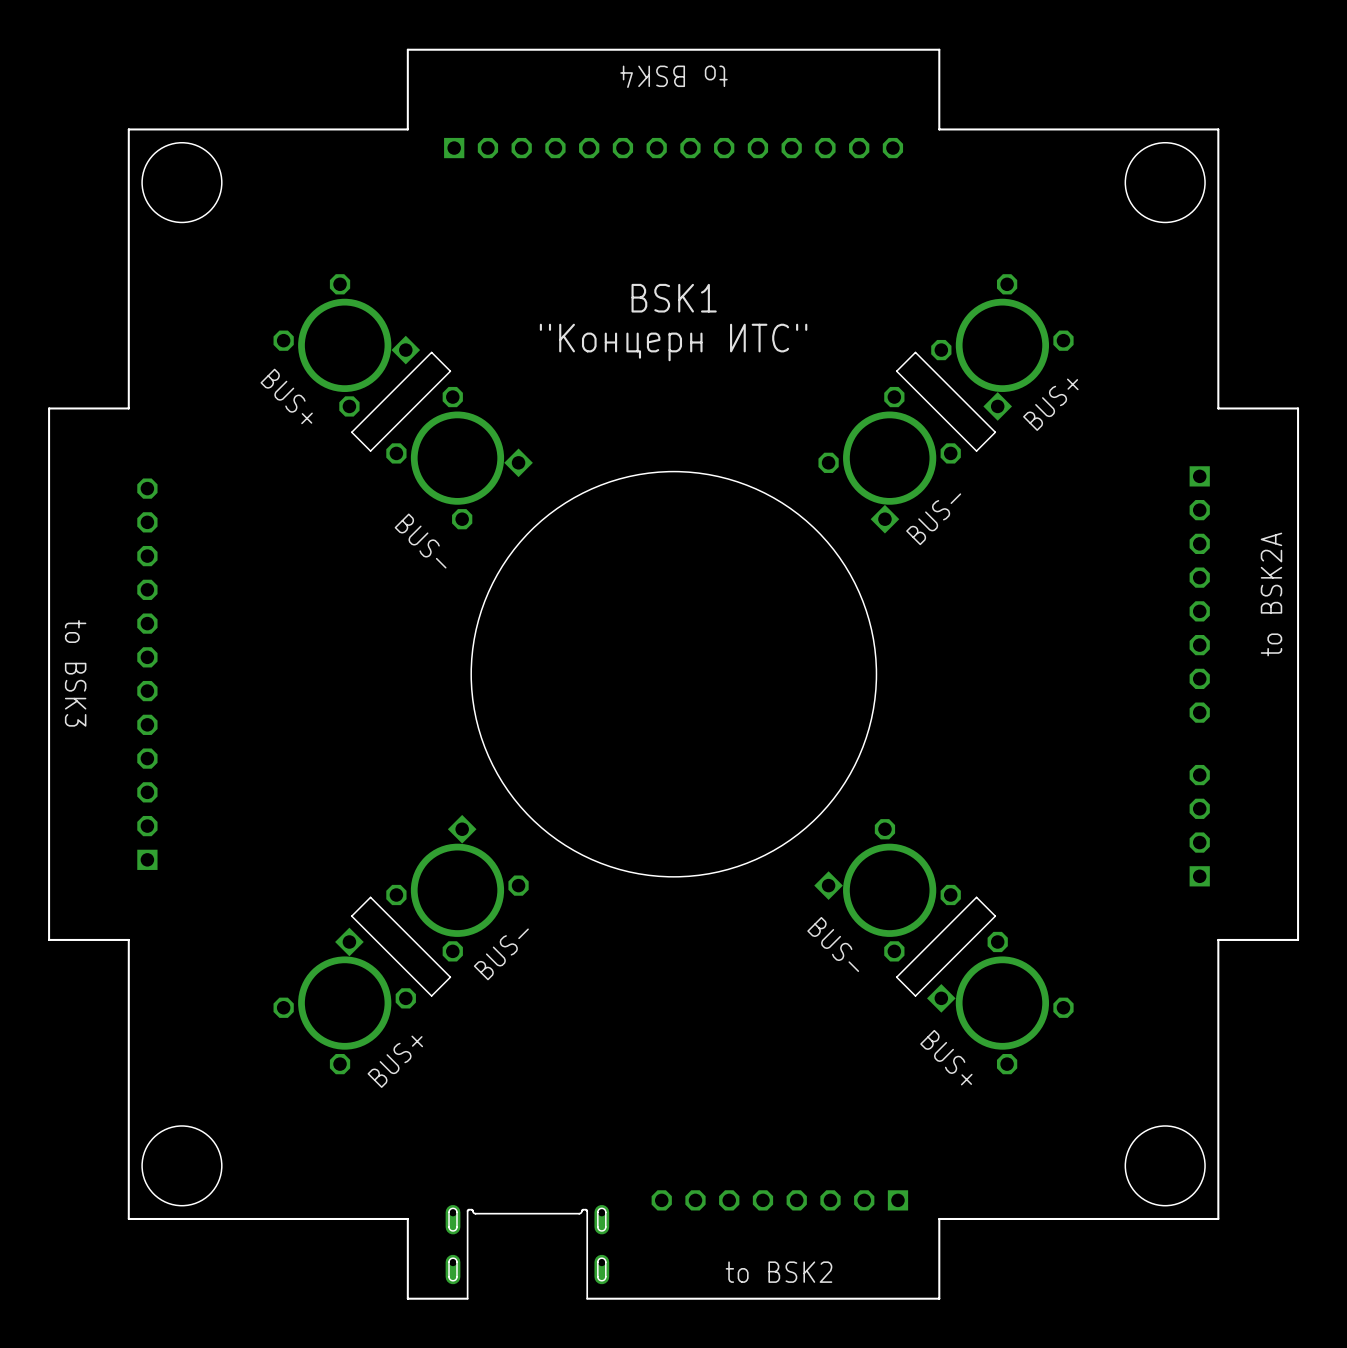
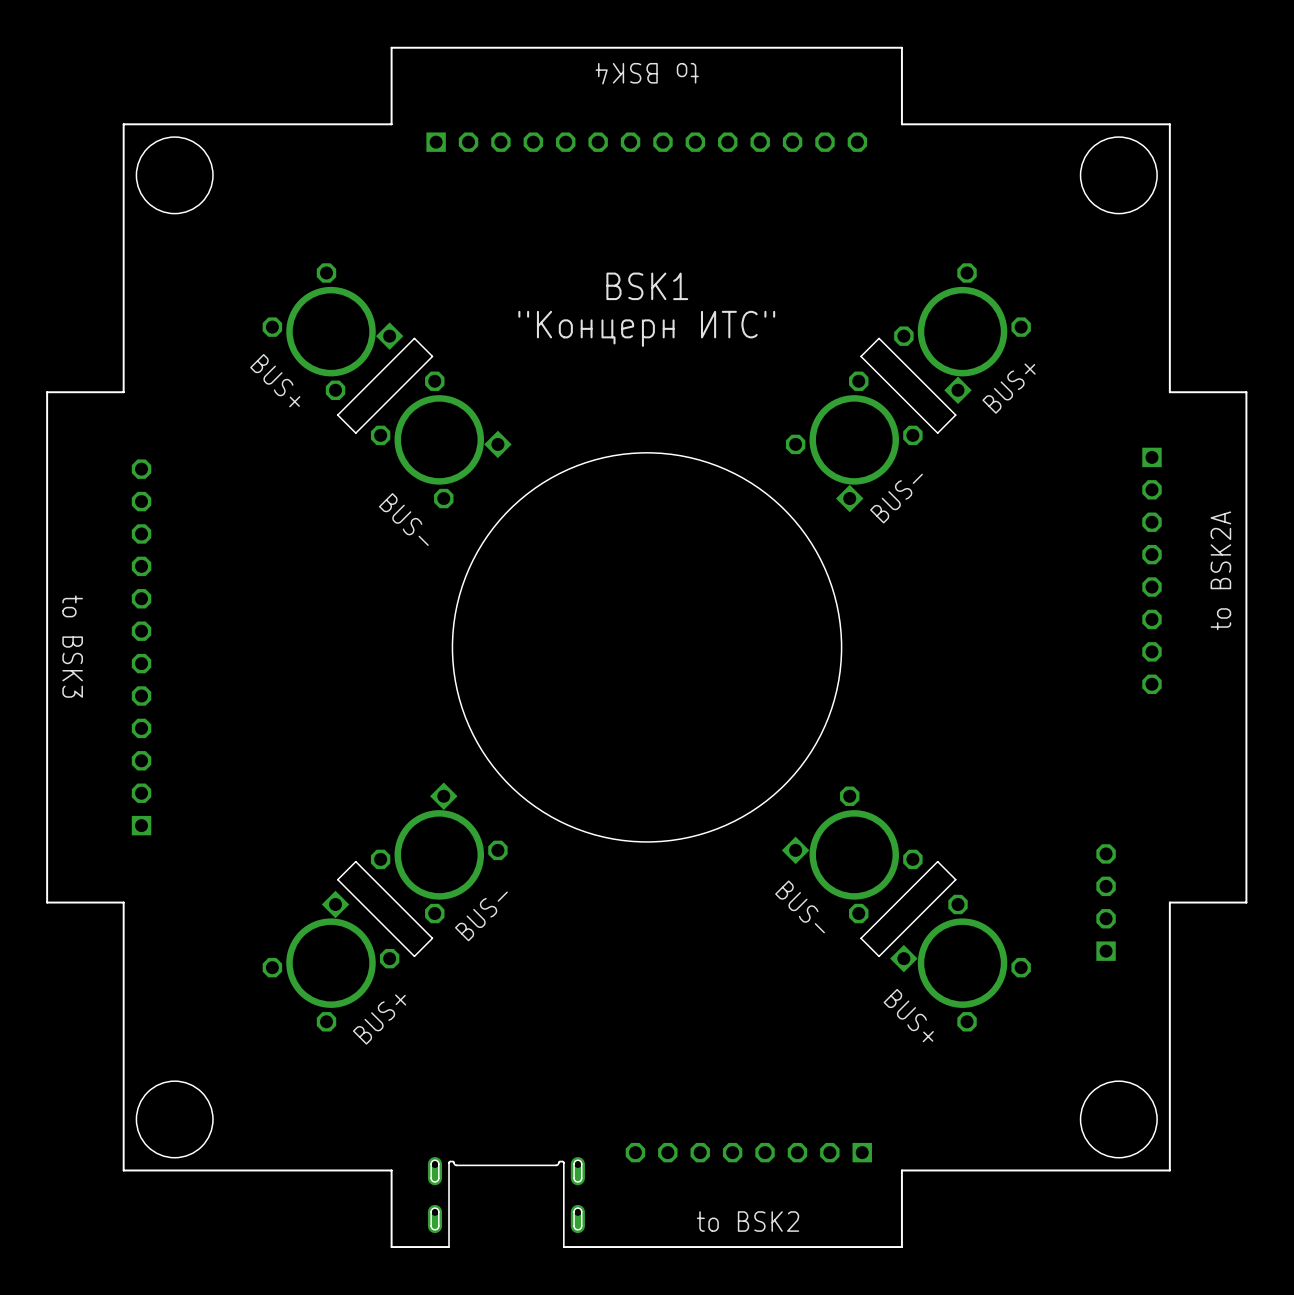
part position: (1199, 825) -> (1106, 902)

